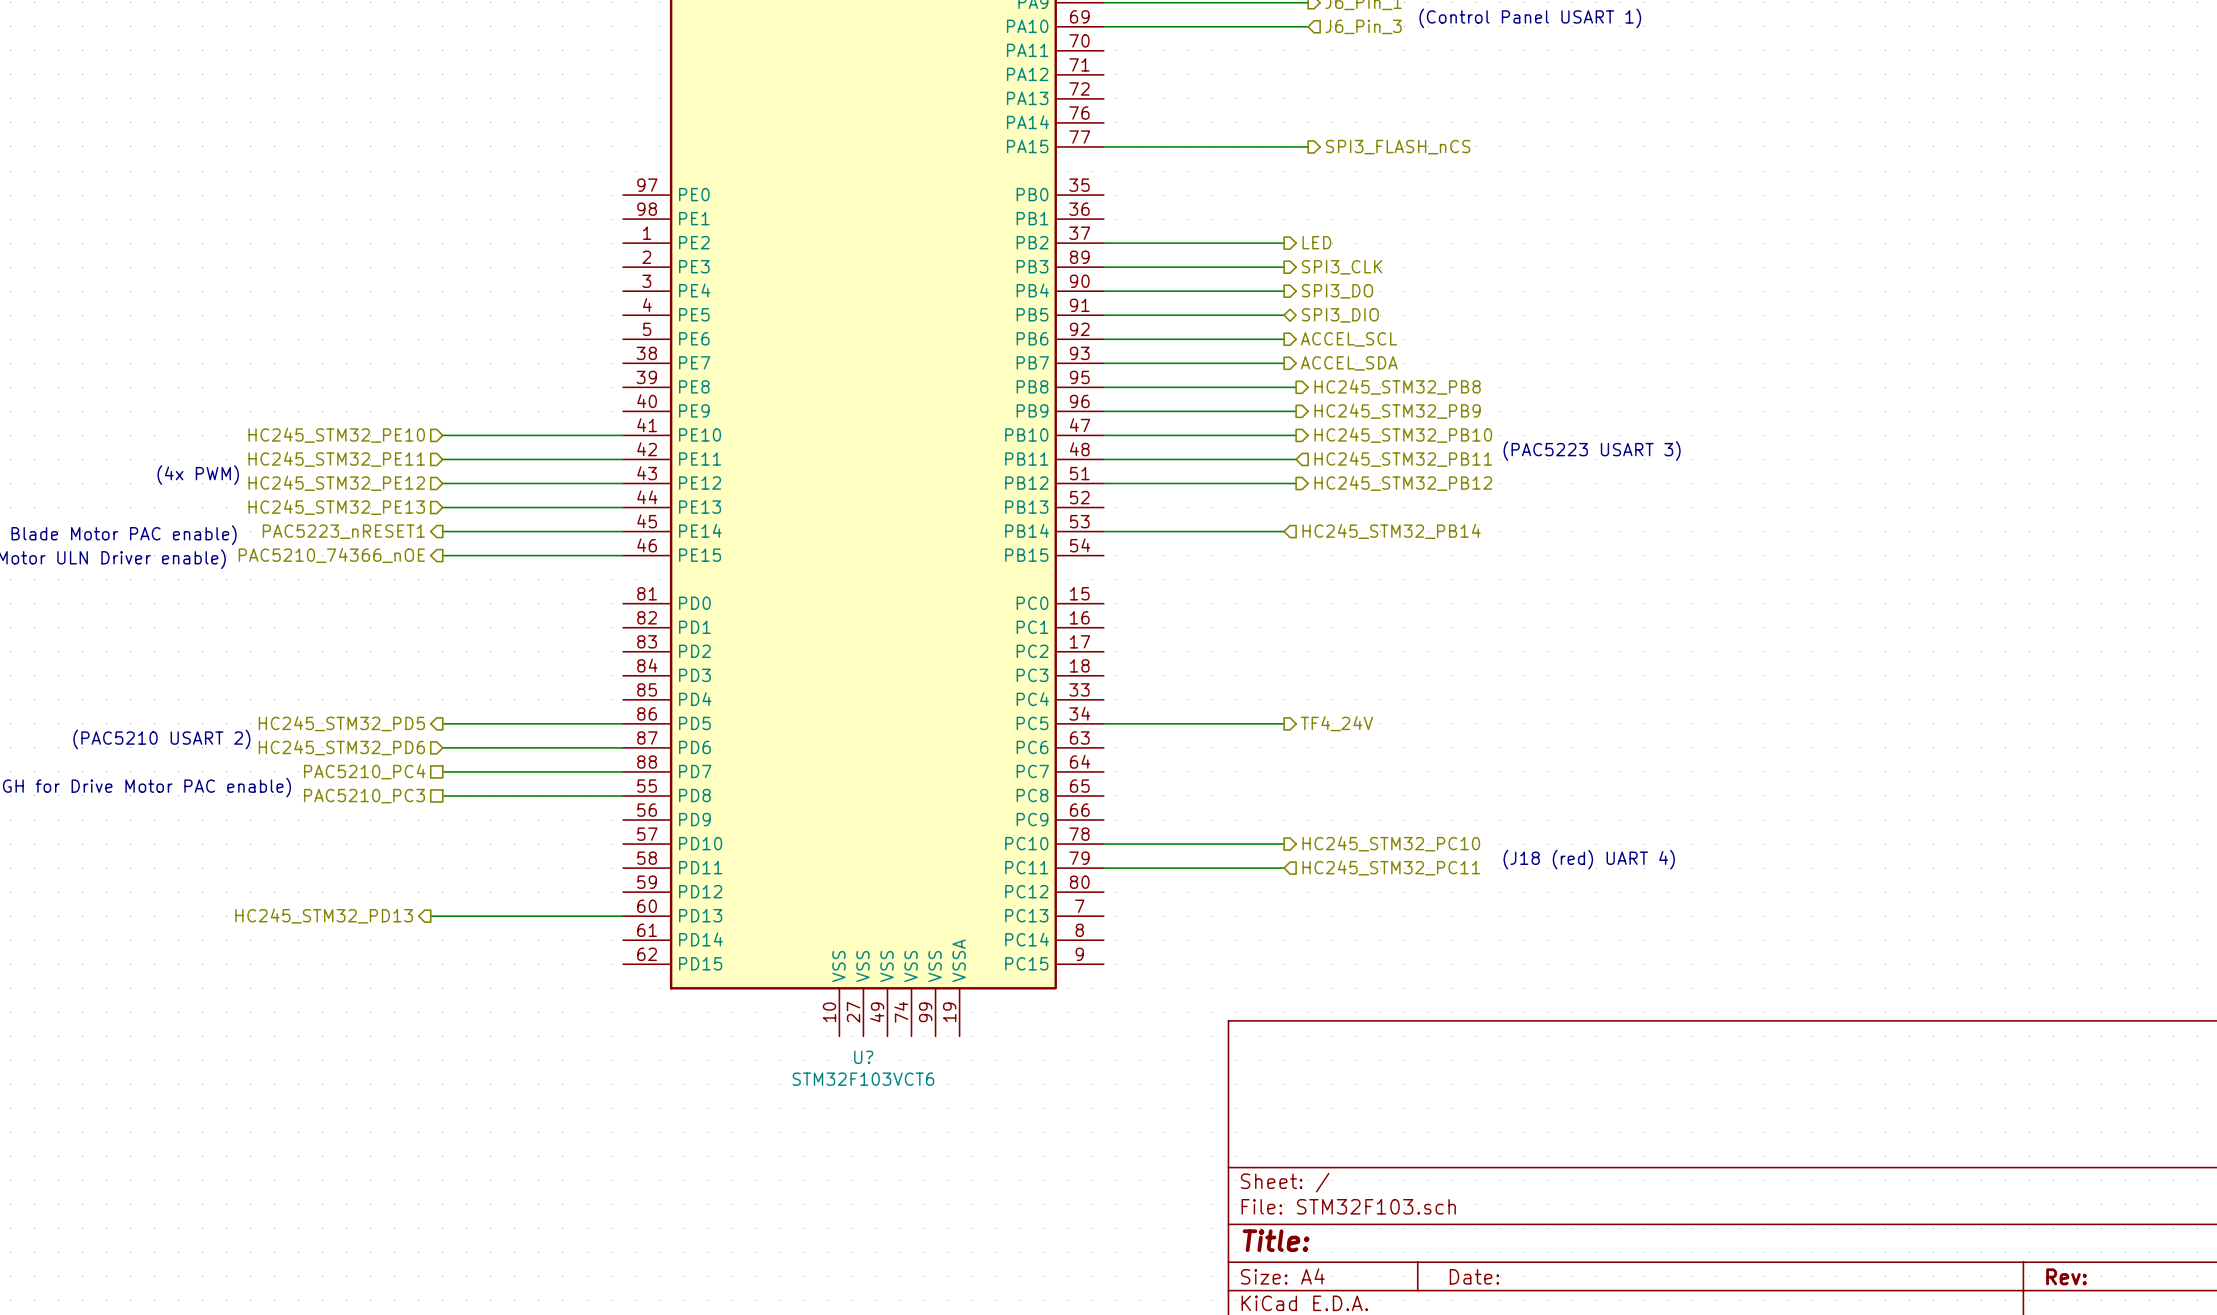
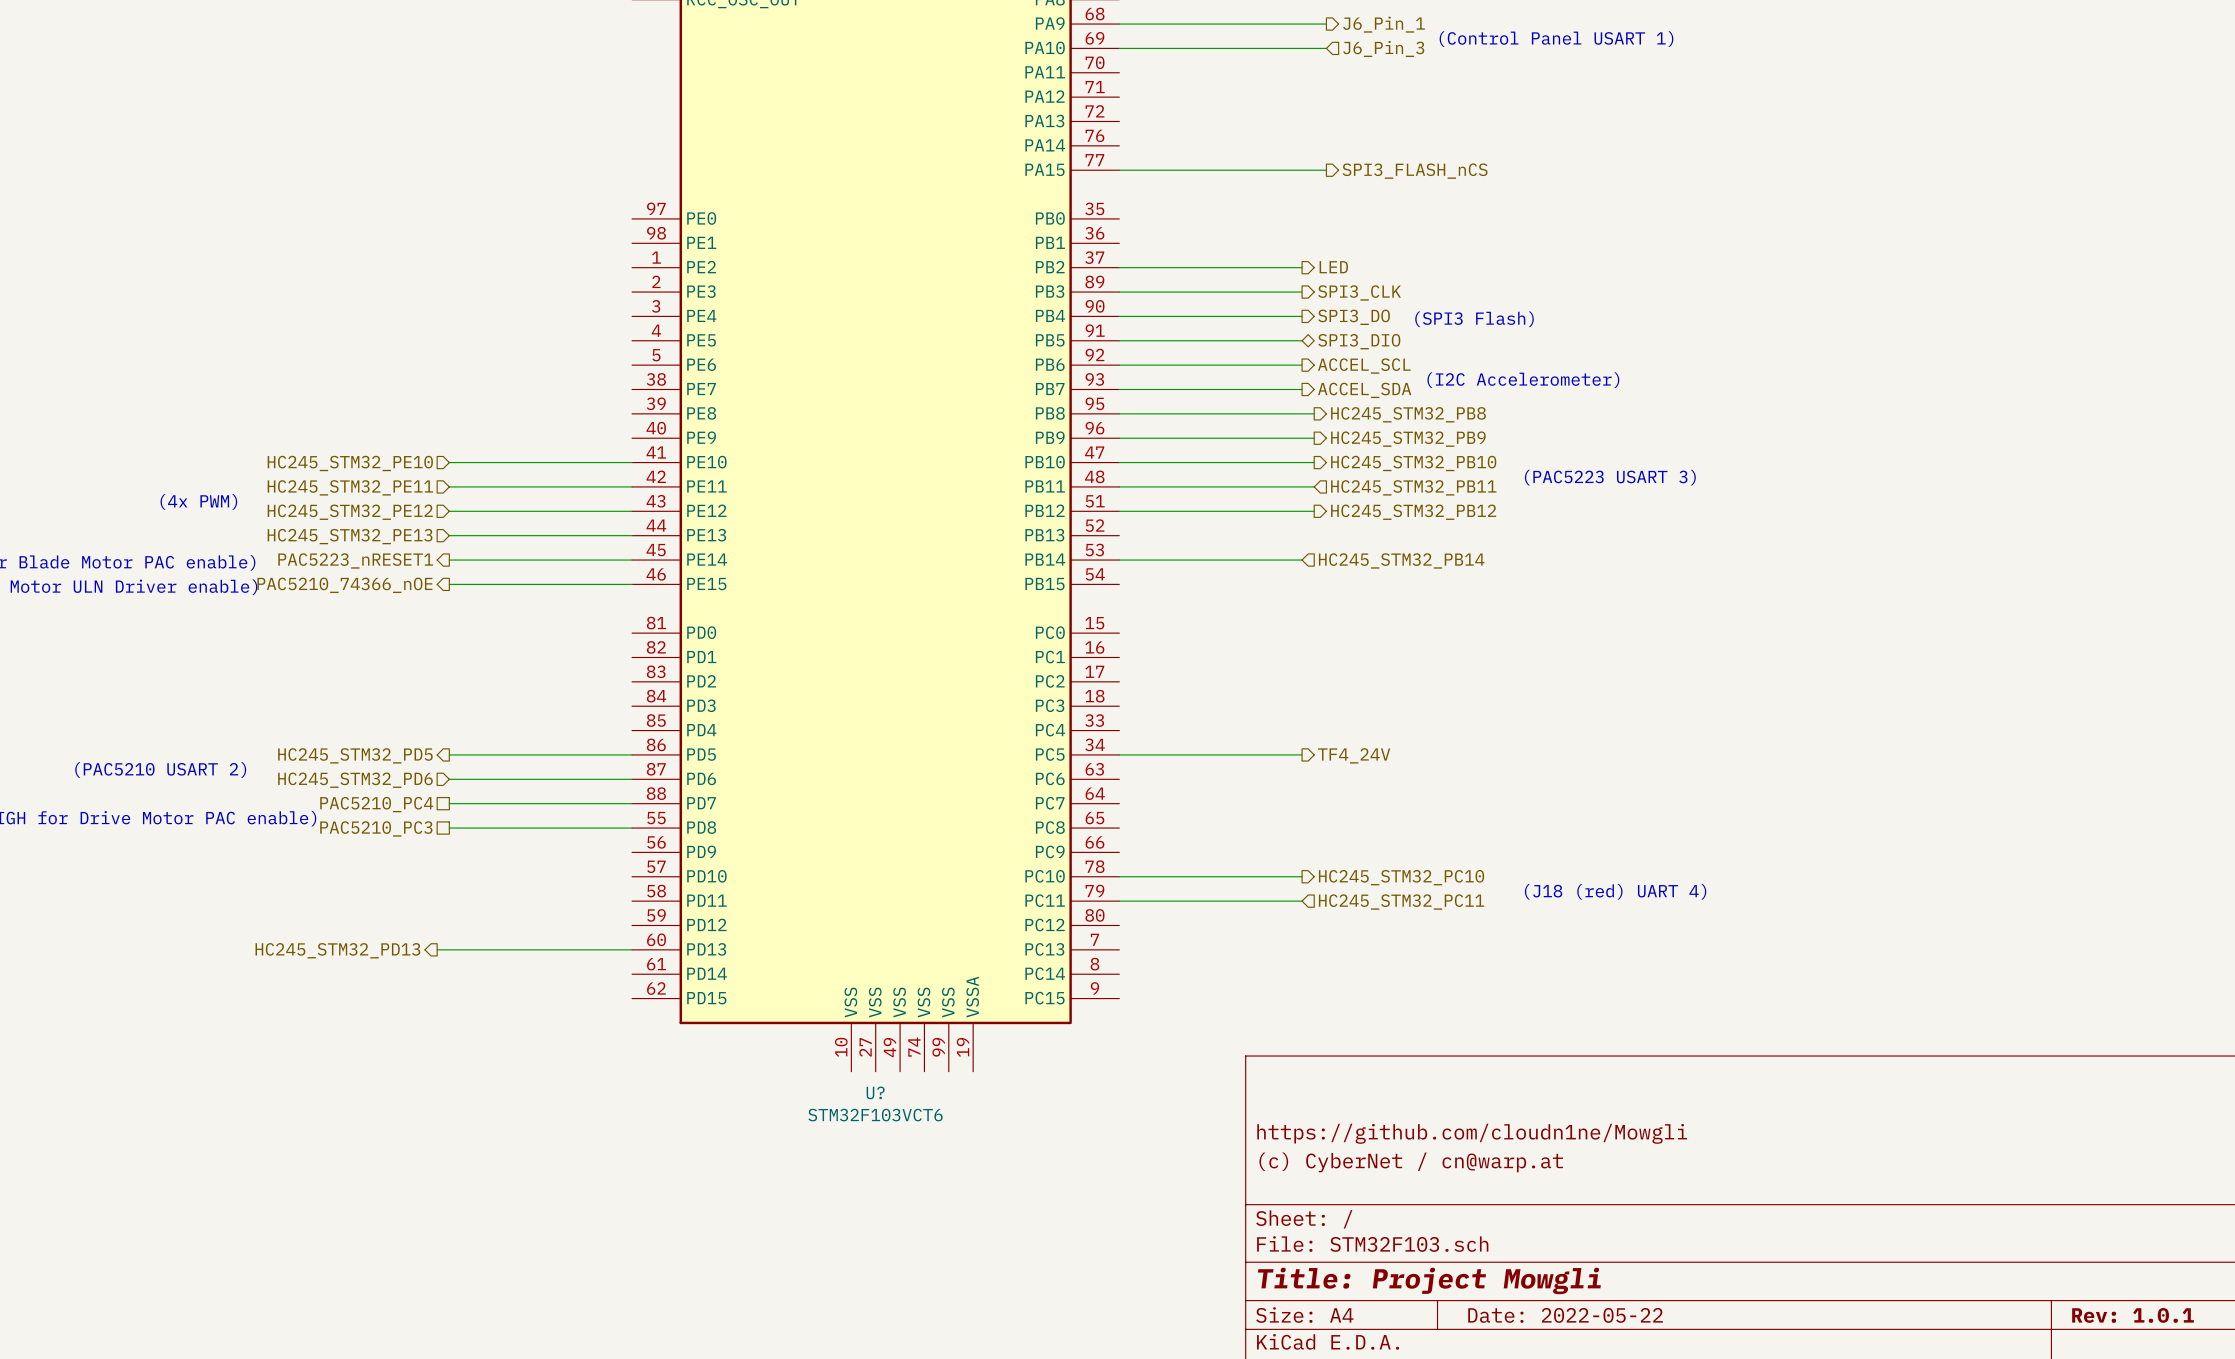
text: none -> (SPI3 Flash) (1474, 319)
text: none -> (I2C Accelerometer) (1523, 380)
title block: none -> https://github.com/cloudn1ne/Mowgli (1472, 1133)
title block: none -> (c) CyberNet / cn@warp.at (1411, 1162)
title block: Title: (1276, 1240) -> Title: Project Mowgli (1429, 1280)
title block: Date: (1474, 1276) -> Date: 2022-05-22 (1565, 1315)
title block: Rev: (2066, 1276) -> Rev: 1.0.1 (2133, 1315)

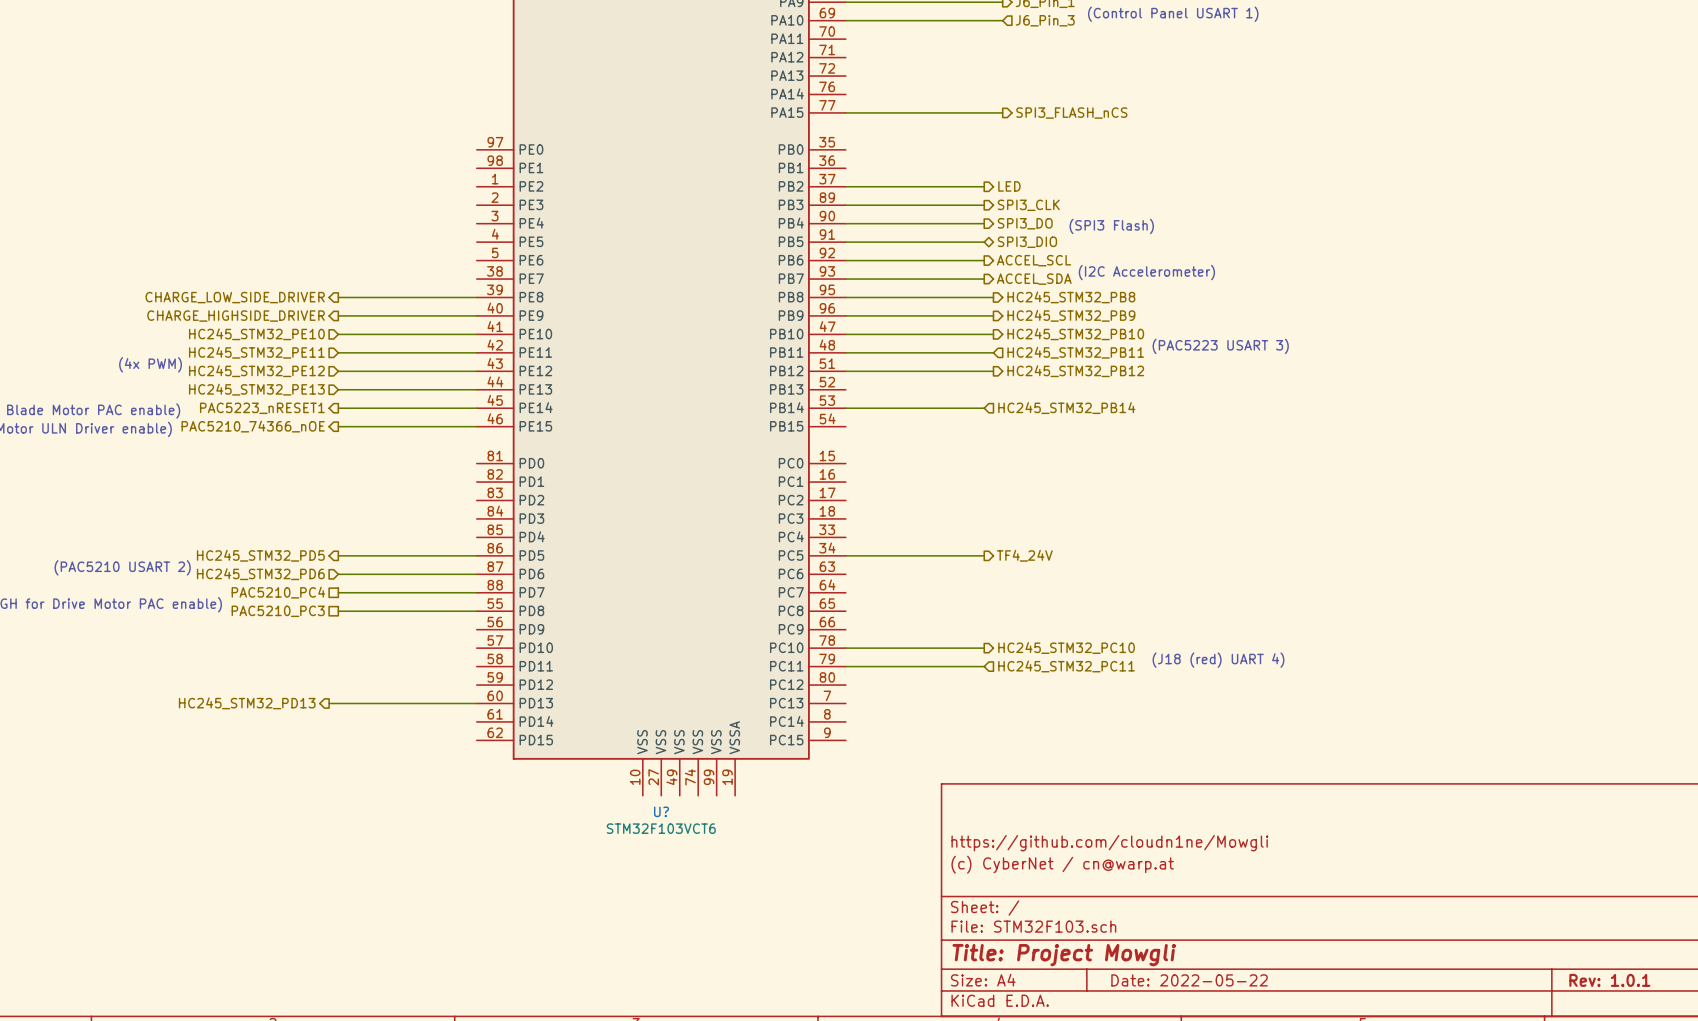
wire: none -> (338, 297) (476, 297)
hierarchical label: none -> CHARGE_LOW_SIDE_DRIVER (235, 297)
wire: none -> (338, 315) (476, 315)
hierarchical label: none -> CHARGE_HIGHSIDE_DRIVER (236, 316)

